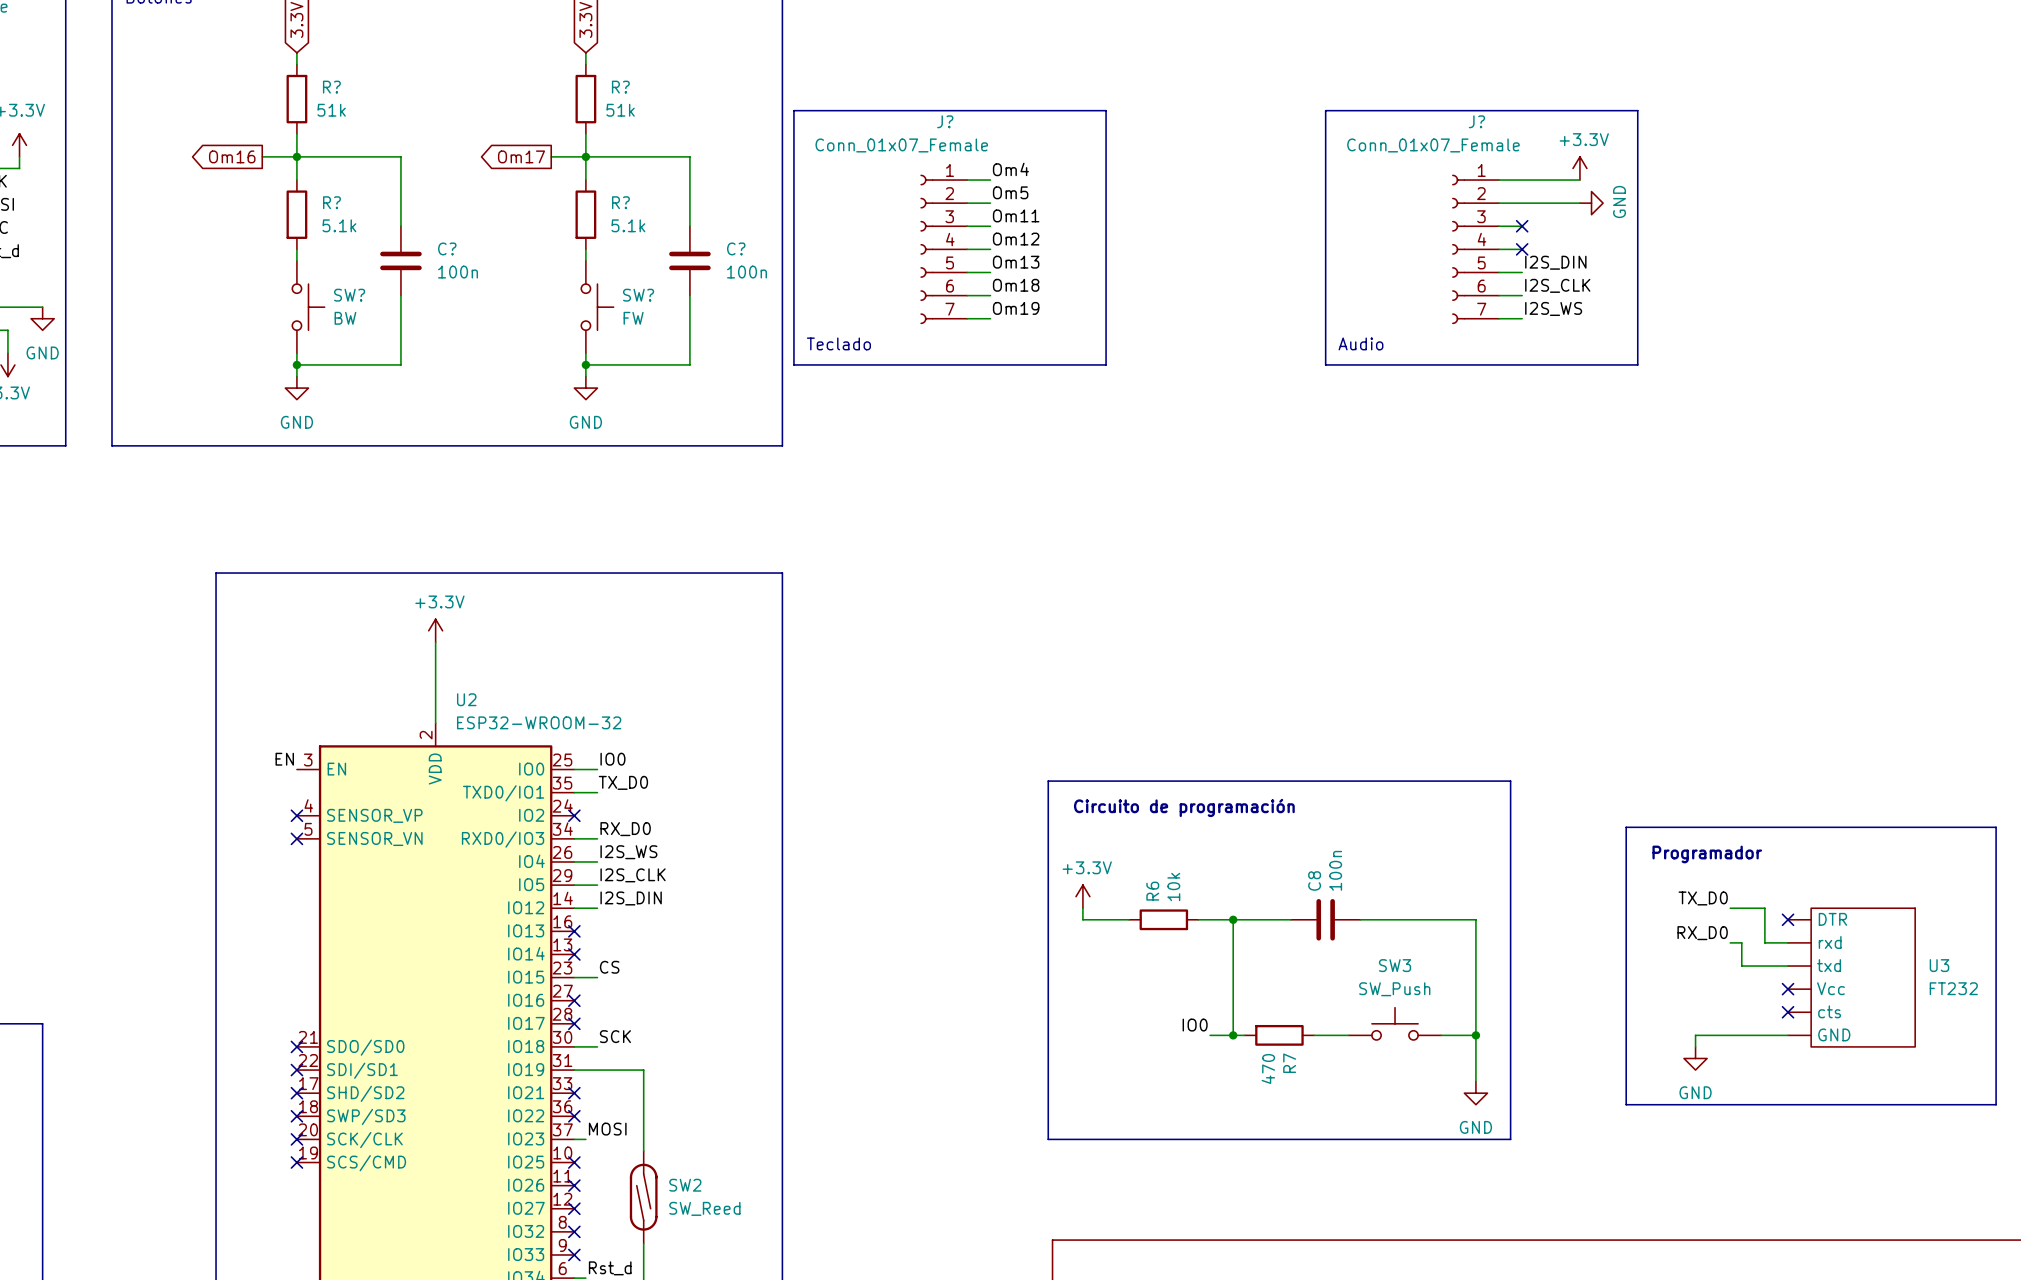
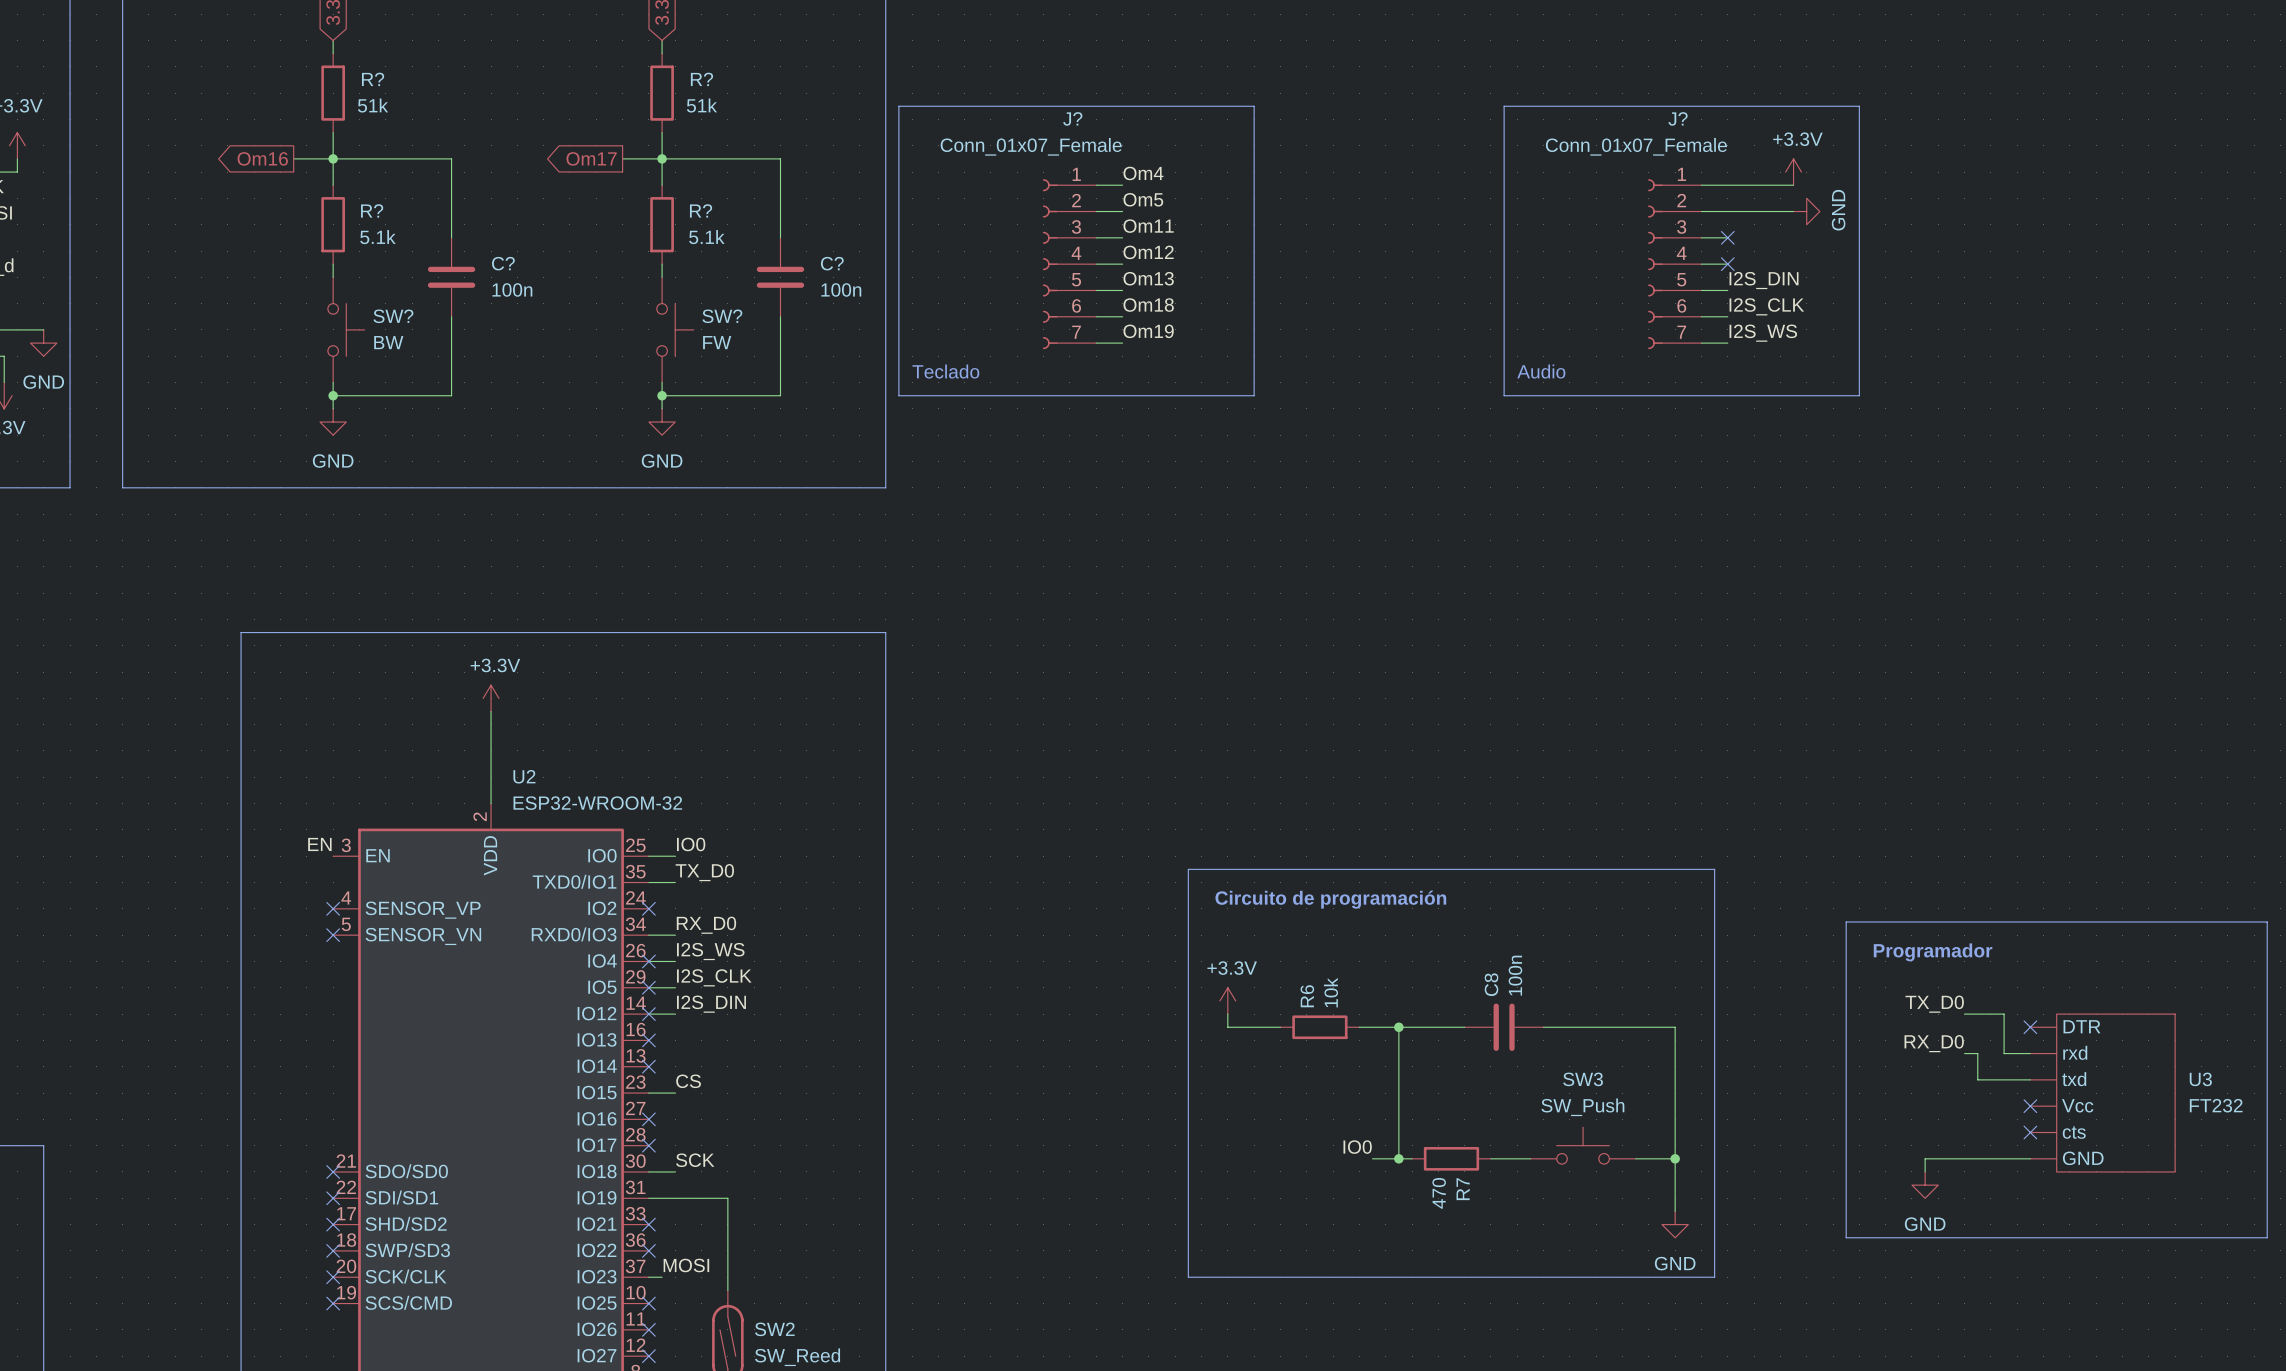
no-connect mark: none -> (648, 961)
no-connect mark: none -> (648, 987)
no-connect mark: none -> (648, 1014)

